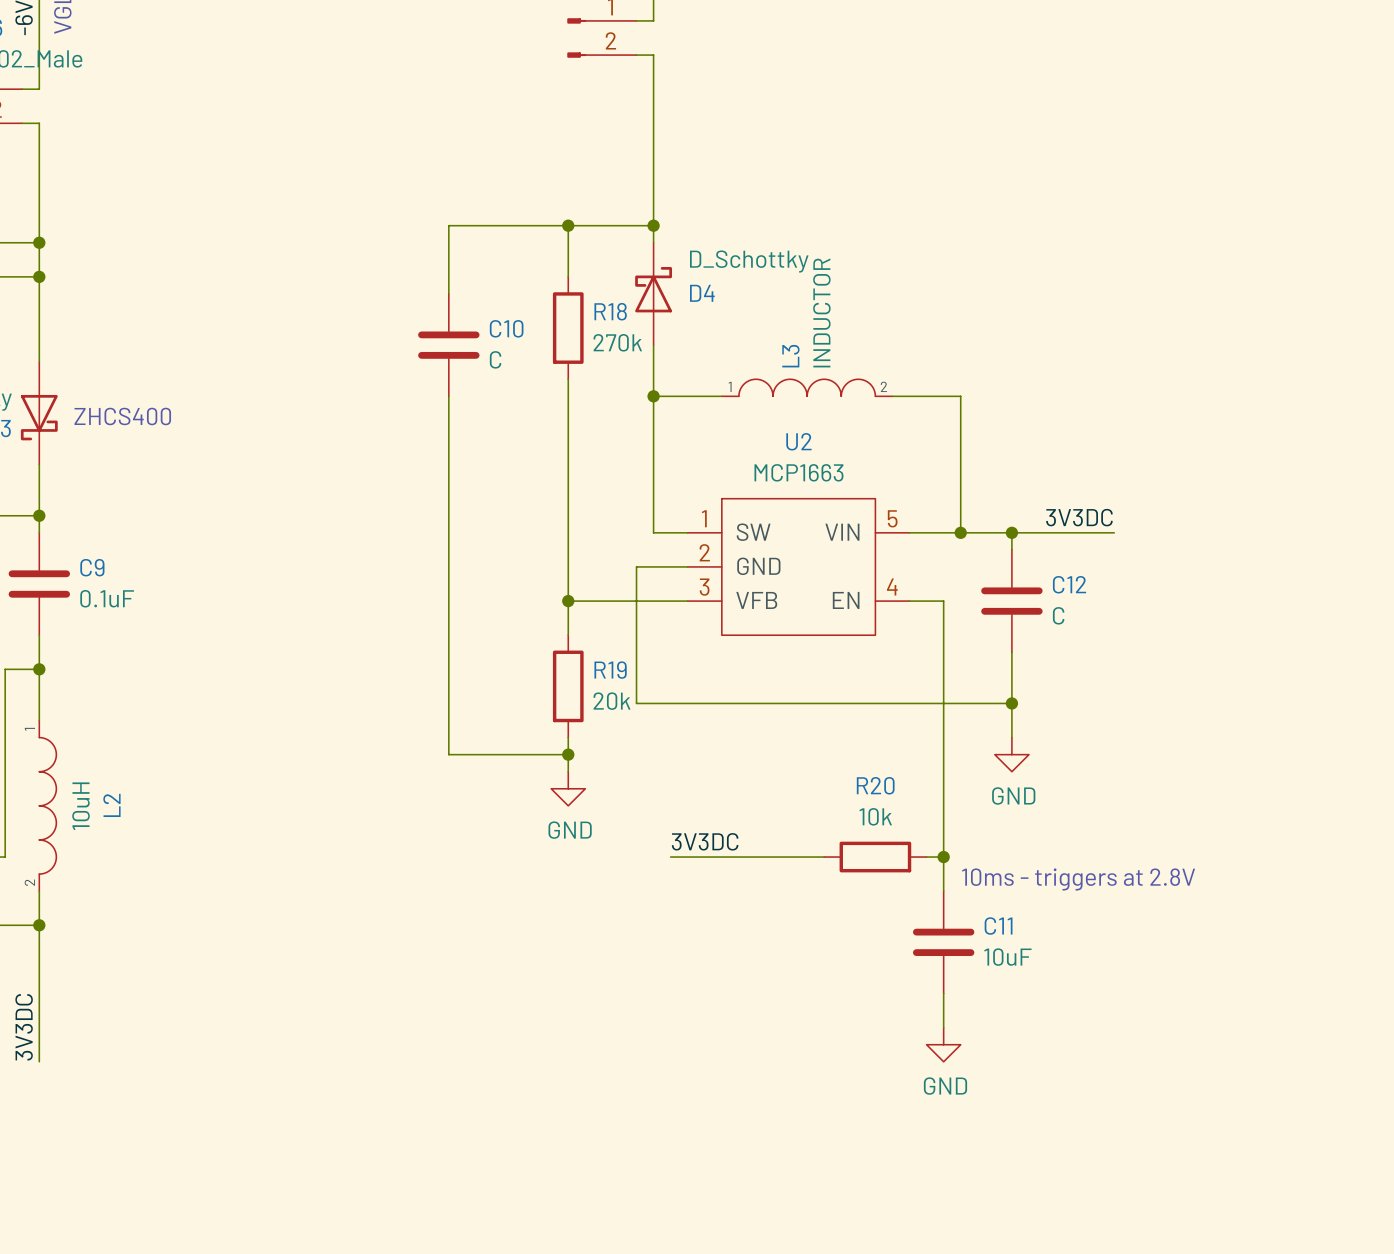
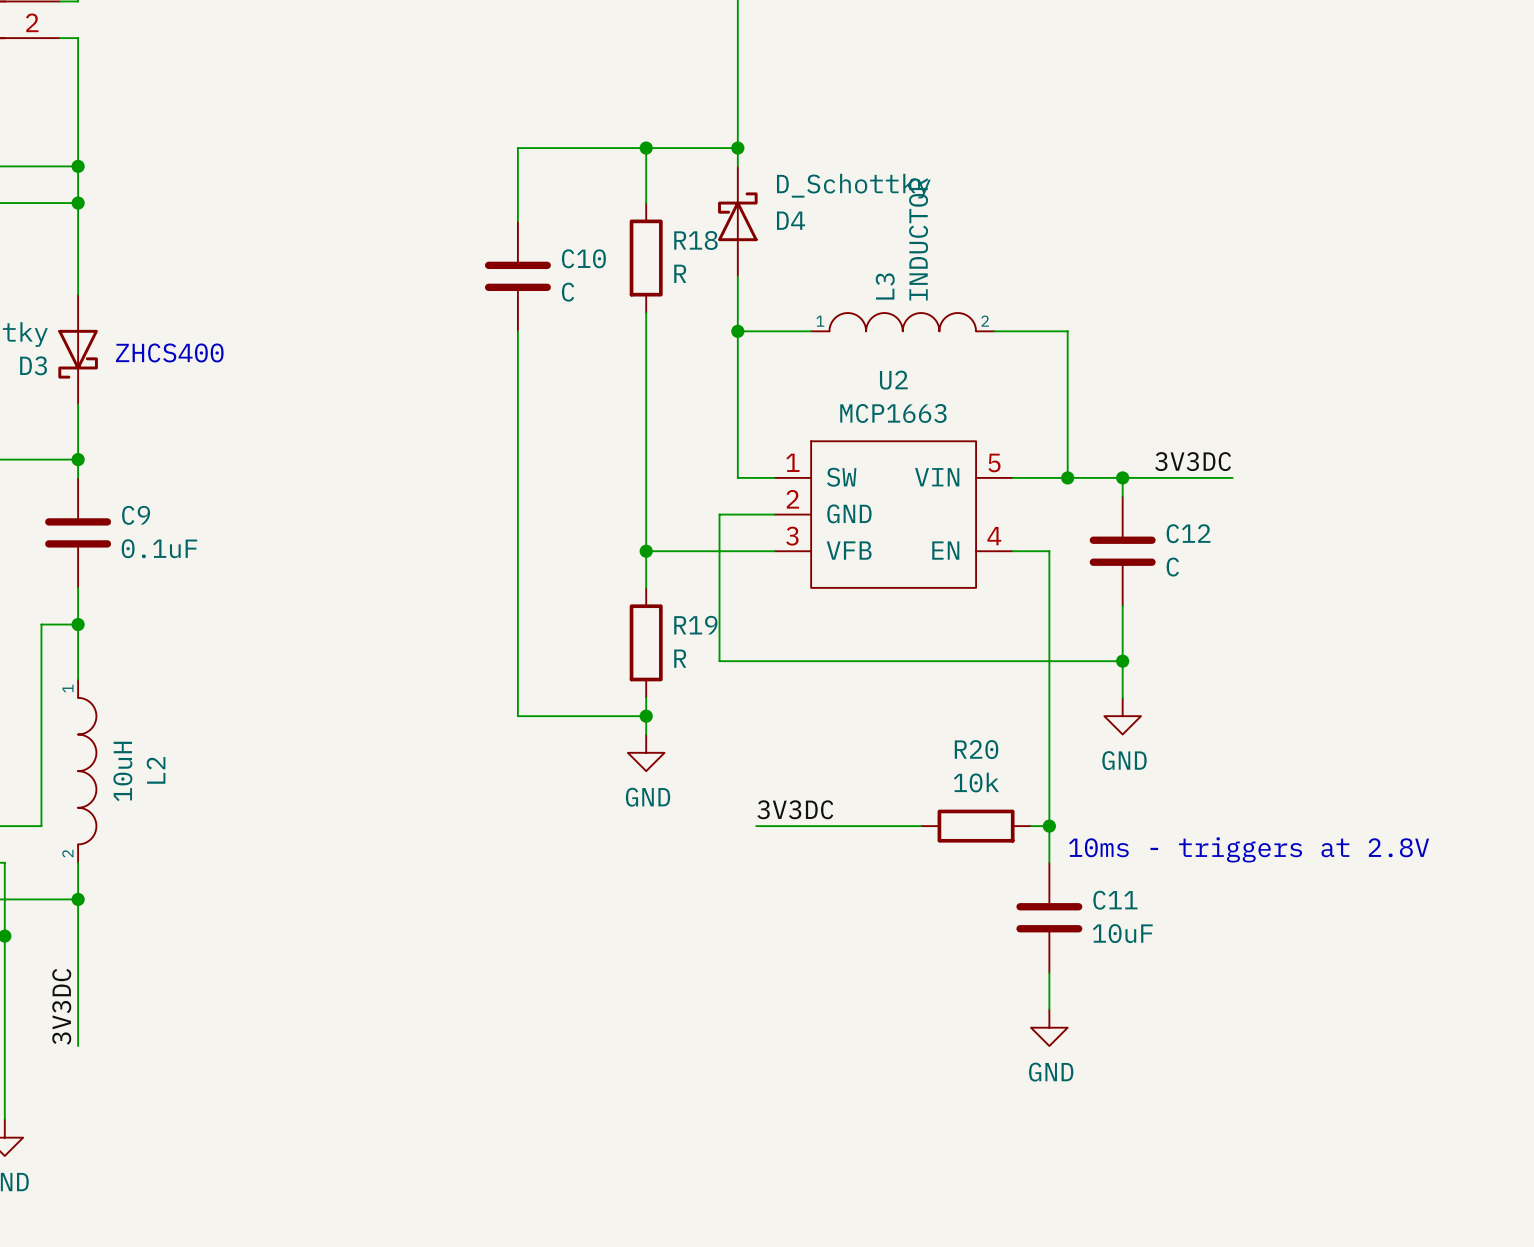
R18 value: 270k (617, 342) -> R (680, 273)
R19 value: 20k (612, 701) -> R (680, 658)

